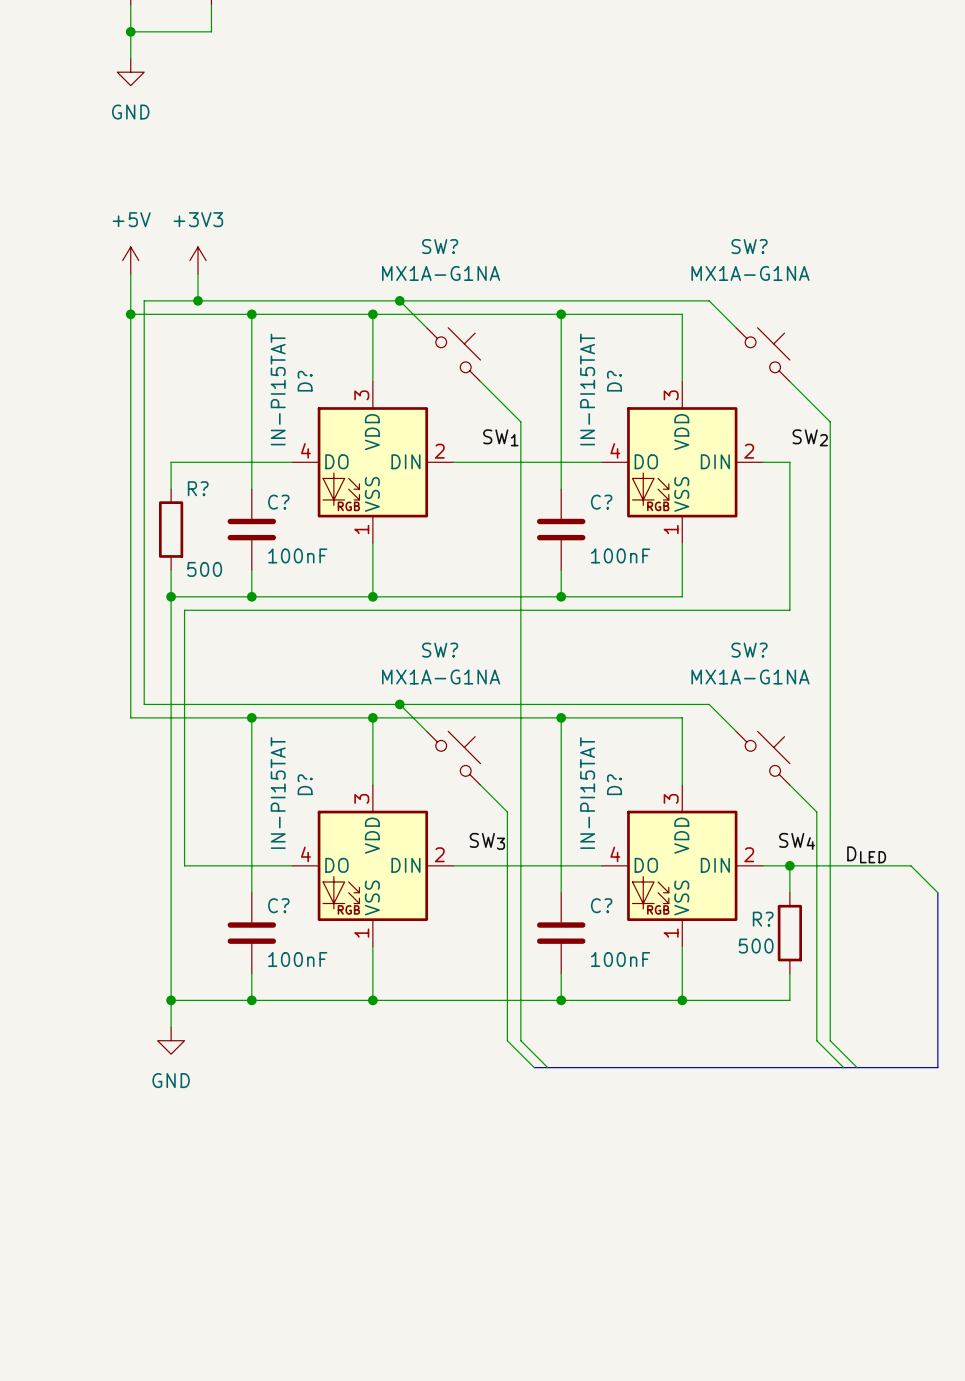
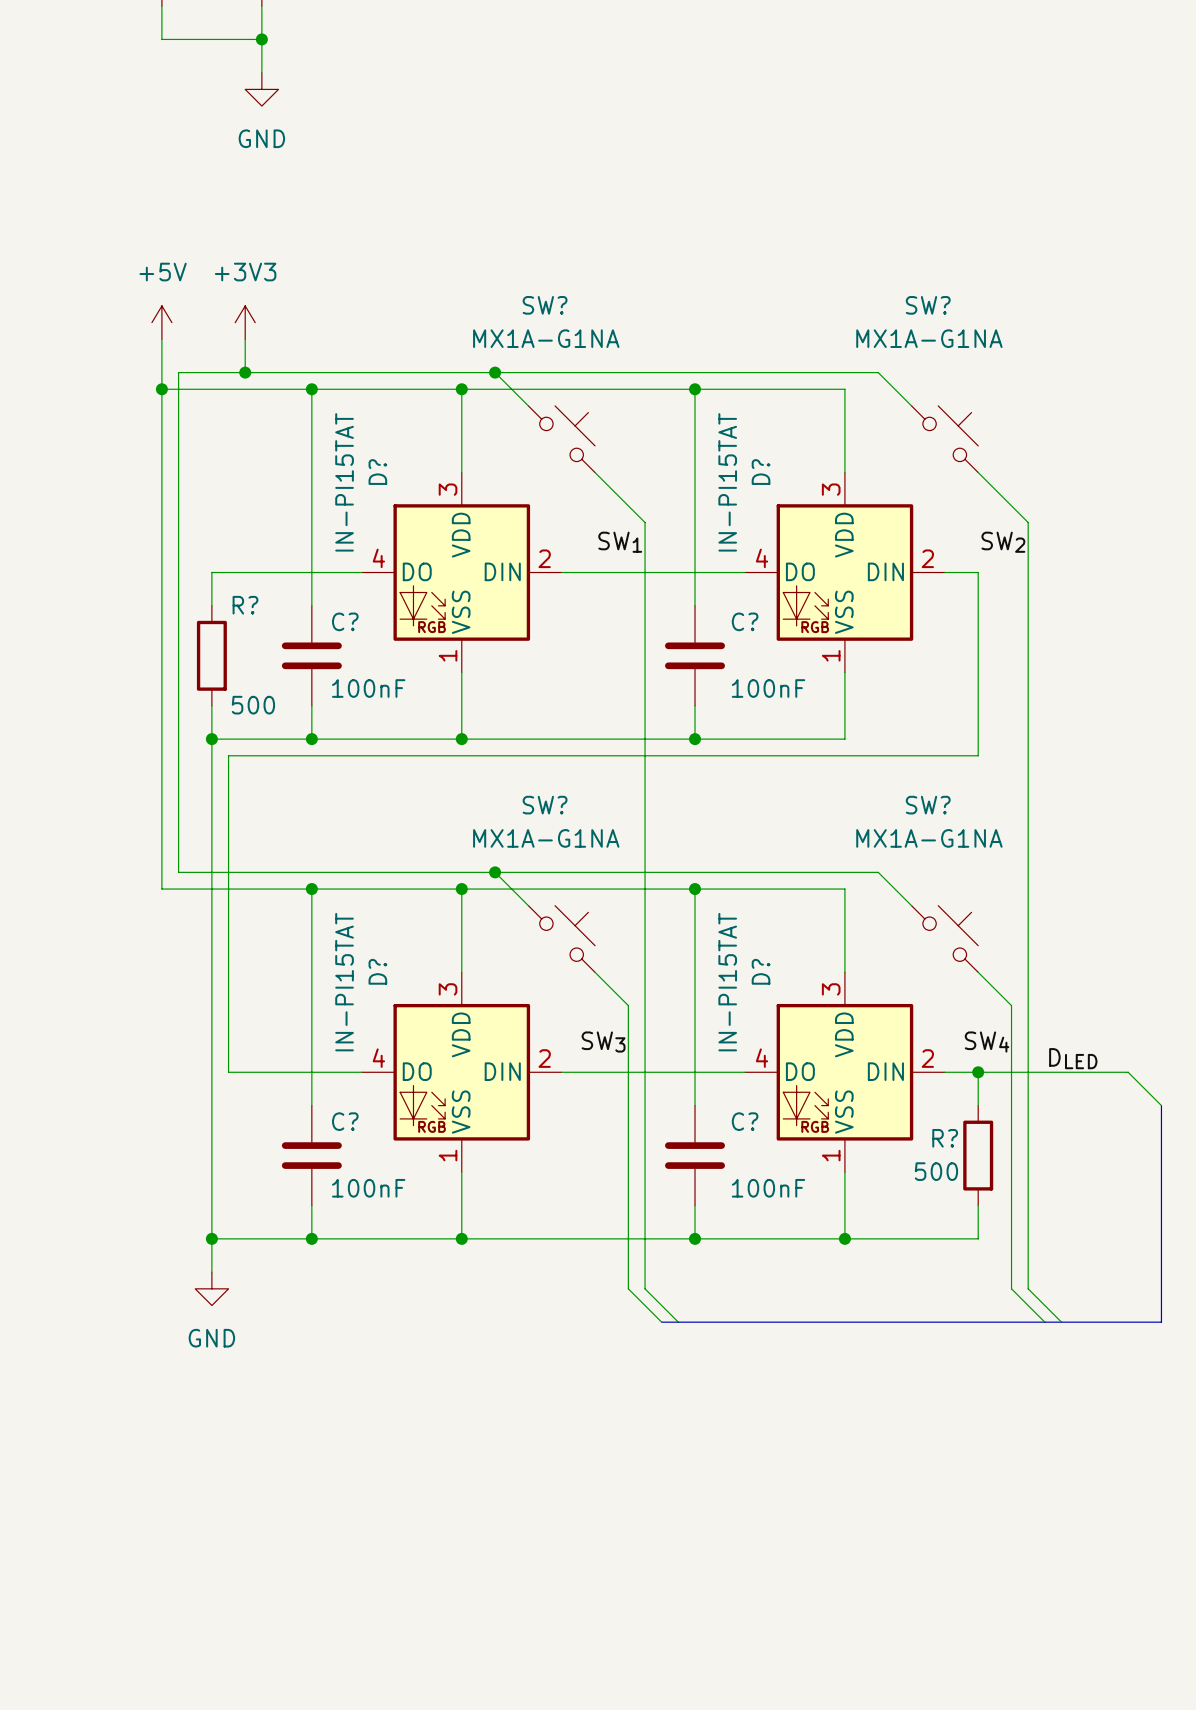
wire: (130, 31) (130, 58) -> (261, 39) (261, 72)
junction: (130, 31) -> none
junction: none -> (261, 39)
power symbol position: GND (130, 72) -> GND (261, 89)

